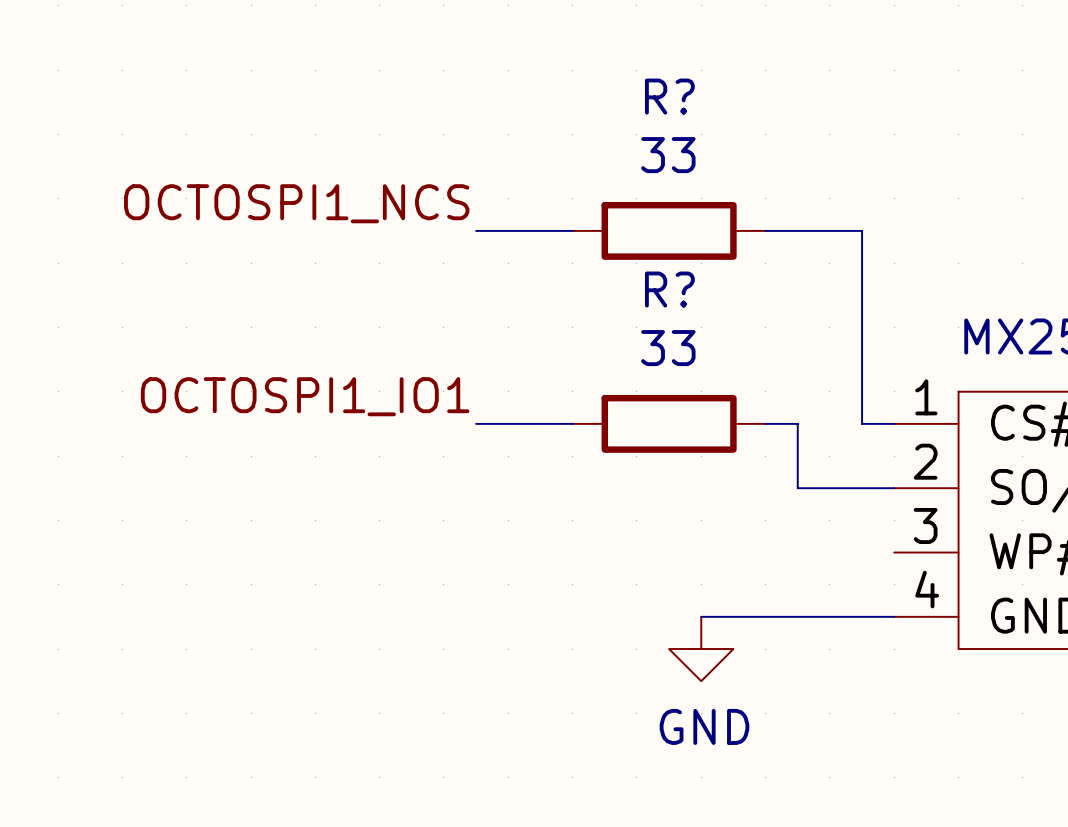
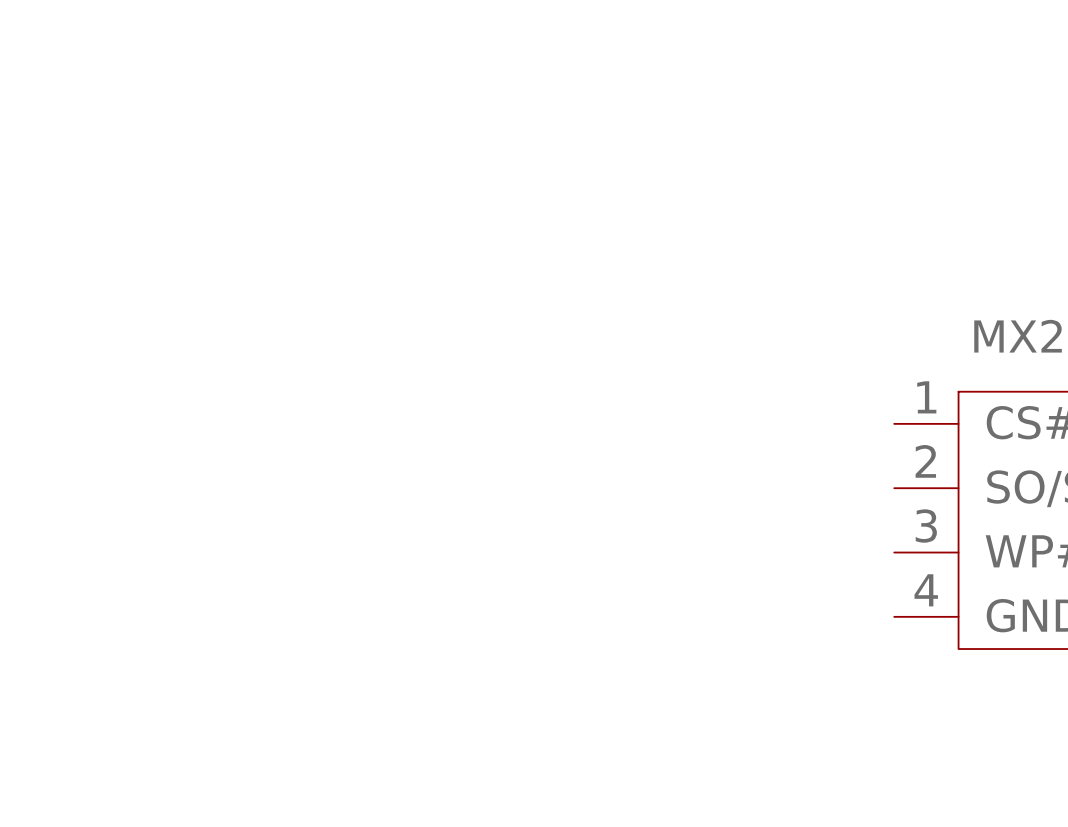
label: OCTOSPI1_NCS (296, 203) -> none
wire: (476, 230) (572, 230) -> none
R?: 33 (669, 230) -> none
wire: (765, 230) (862, 230) (862, 423) (894, 423) -> none
label: OCTOSPI1_IO1 (305, 396) -> none
wire: (476, 423) (572, 423) -> none
R?: 33 (669, 423) -> none
wire: (765, 423) (797, 423) (797, 488) (894, 488) -> none
wire: (701, 616) (894, 616) -> none
power symbol: GND (701, 649) -> none

